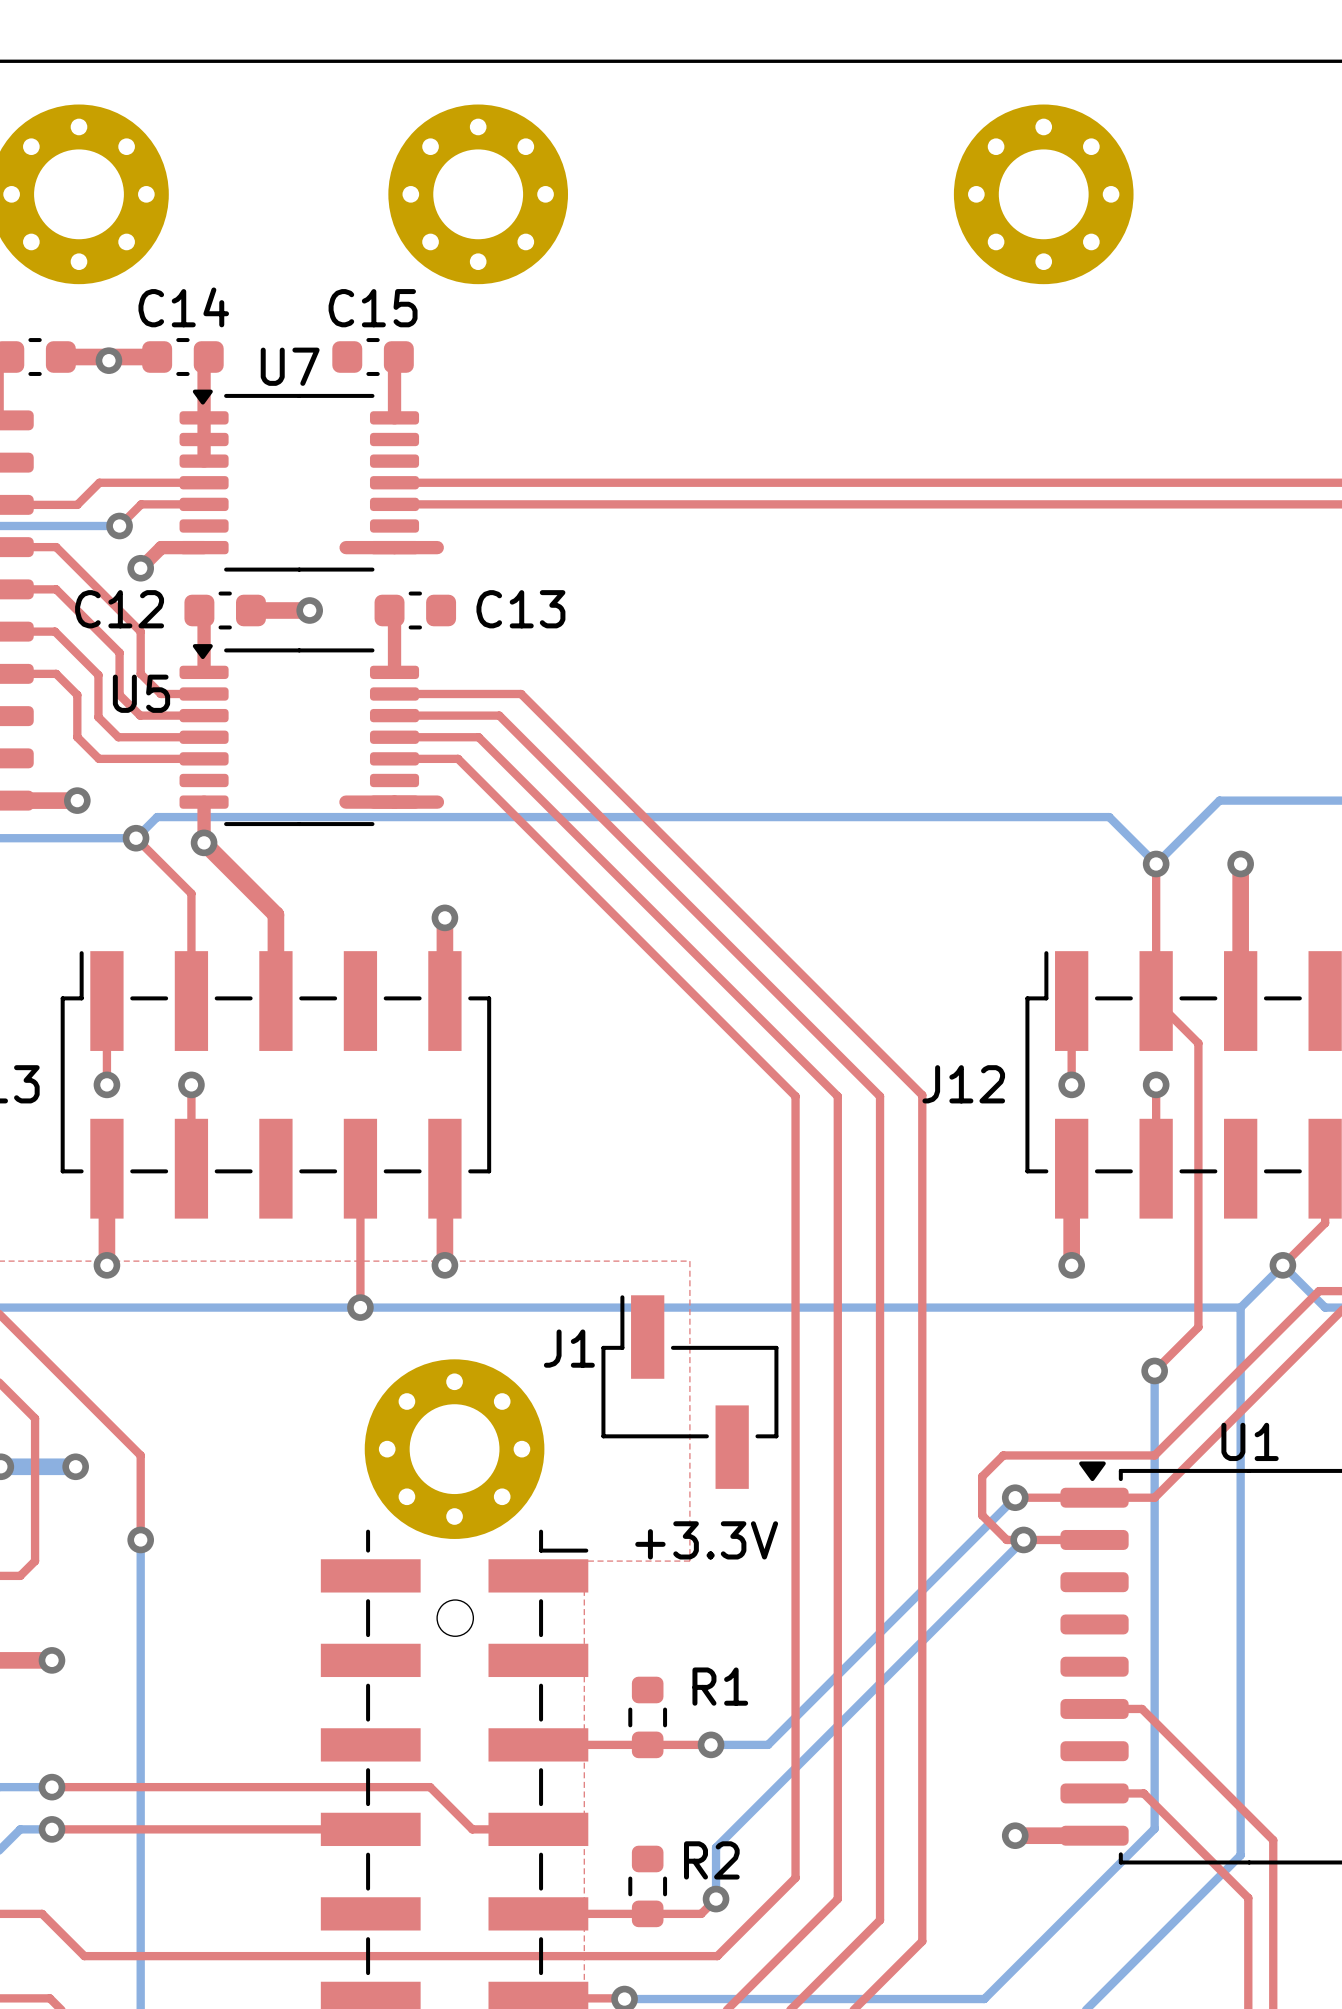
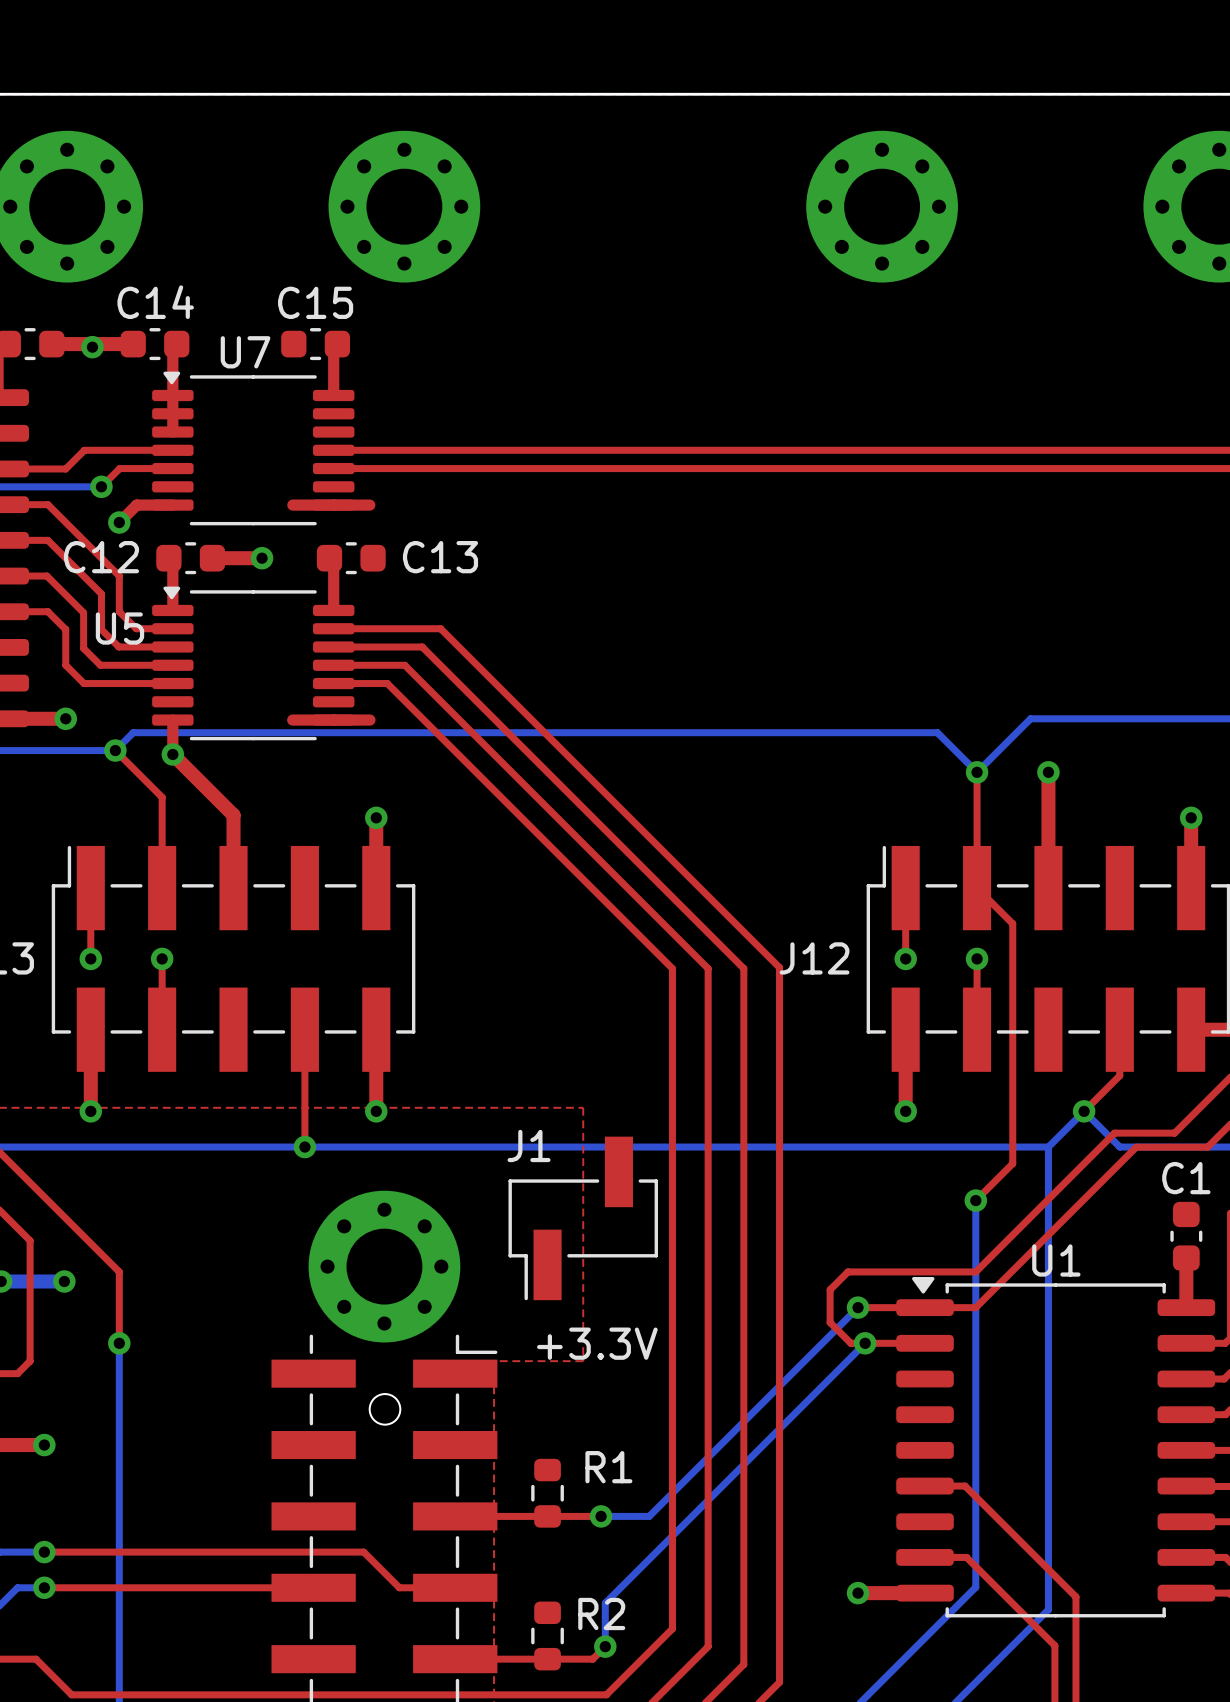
J1 footprint: [601, 1295, 779, 1489] -> [508, 1136, 658, 1301]
J1 name position: J1 (569, 1348) -> J1 (529, 1145)

